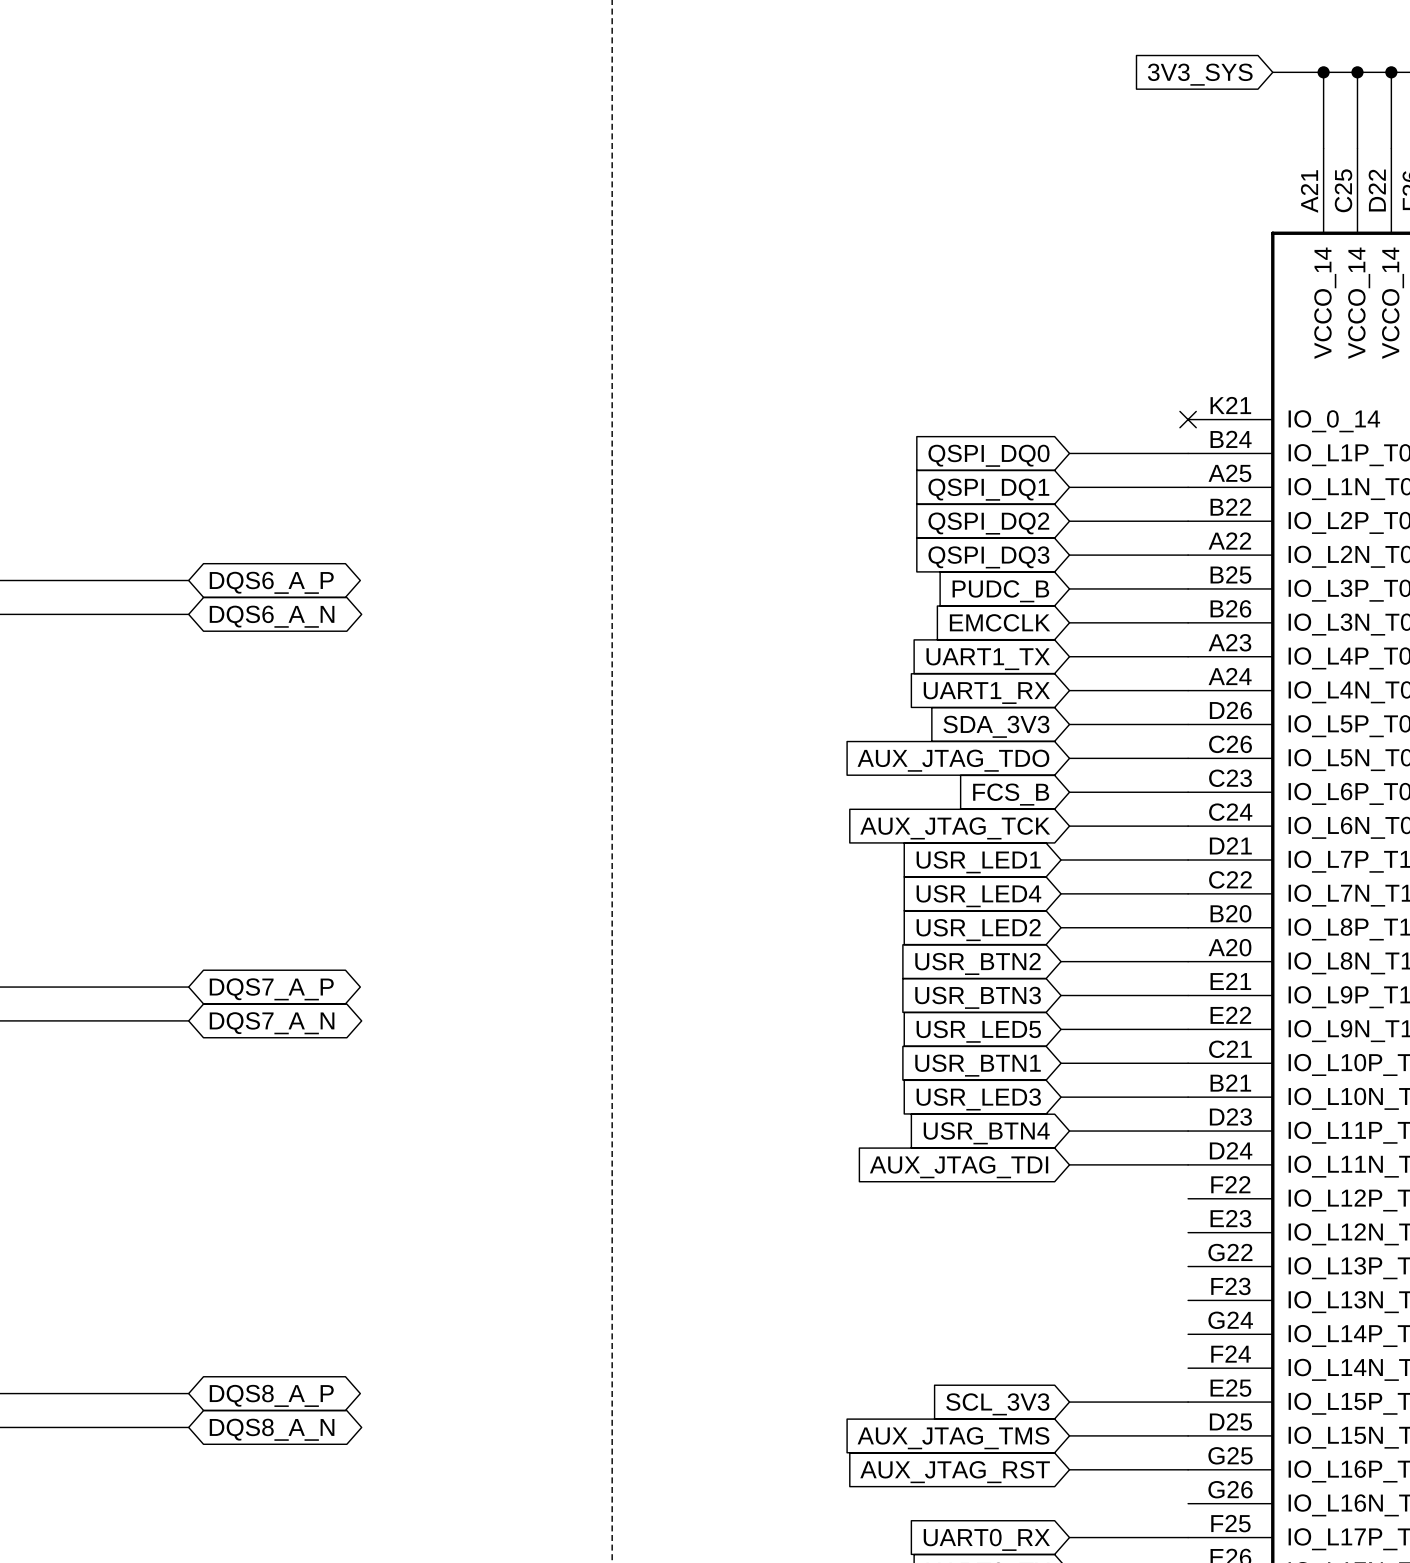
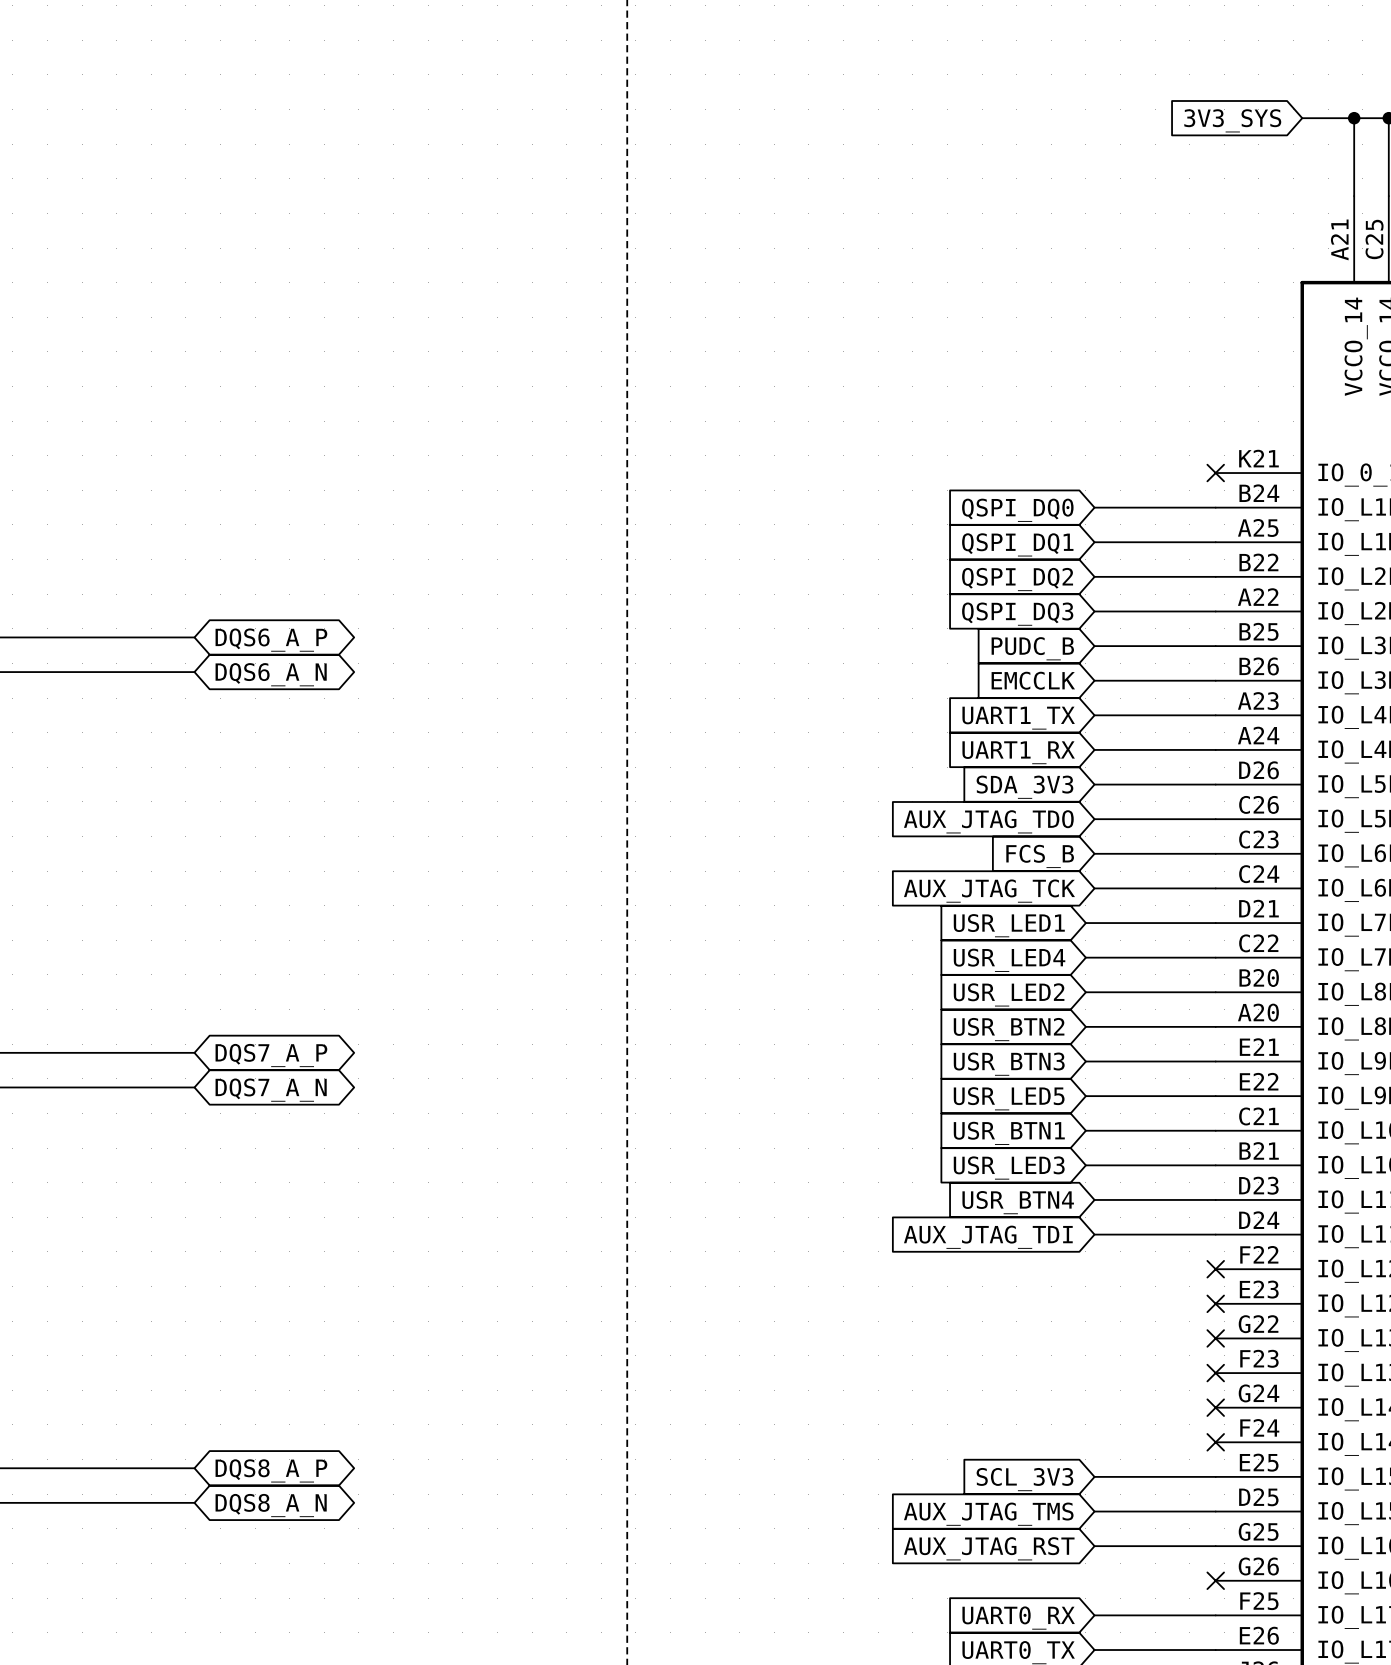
no-connect mark: none -> (1215, 1269)
no-connect mark: none -> (1215, 1303)
no-connect mark: none -> (1215, 1338)
no-connect mark: none -> (1215, 1373)
no-connect mark: none -> (1215, 1407)
no-connect mark: none -> (1215, 1442)
no-connect mark: none -> (1215, 1580)

